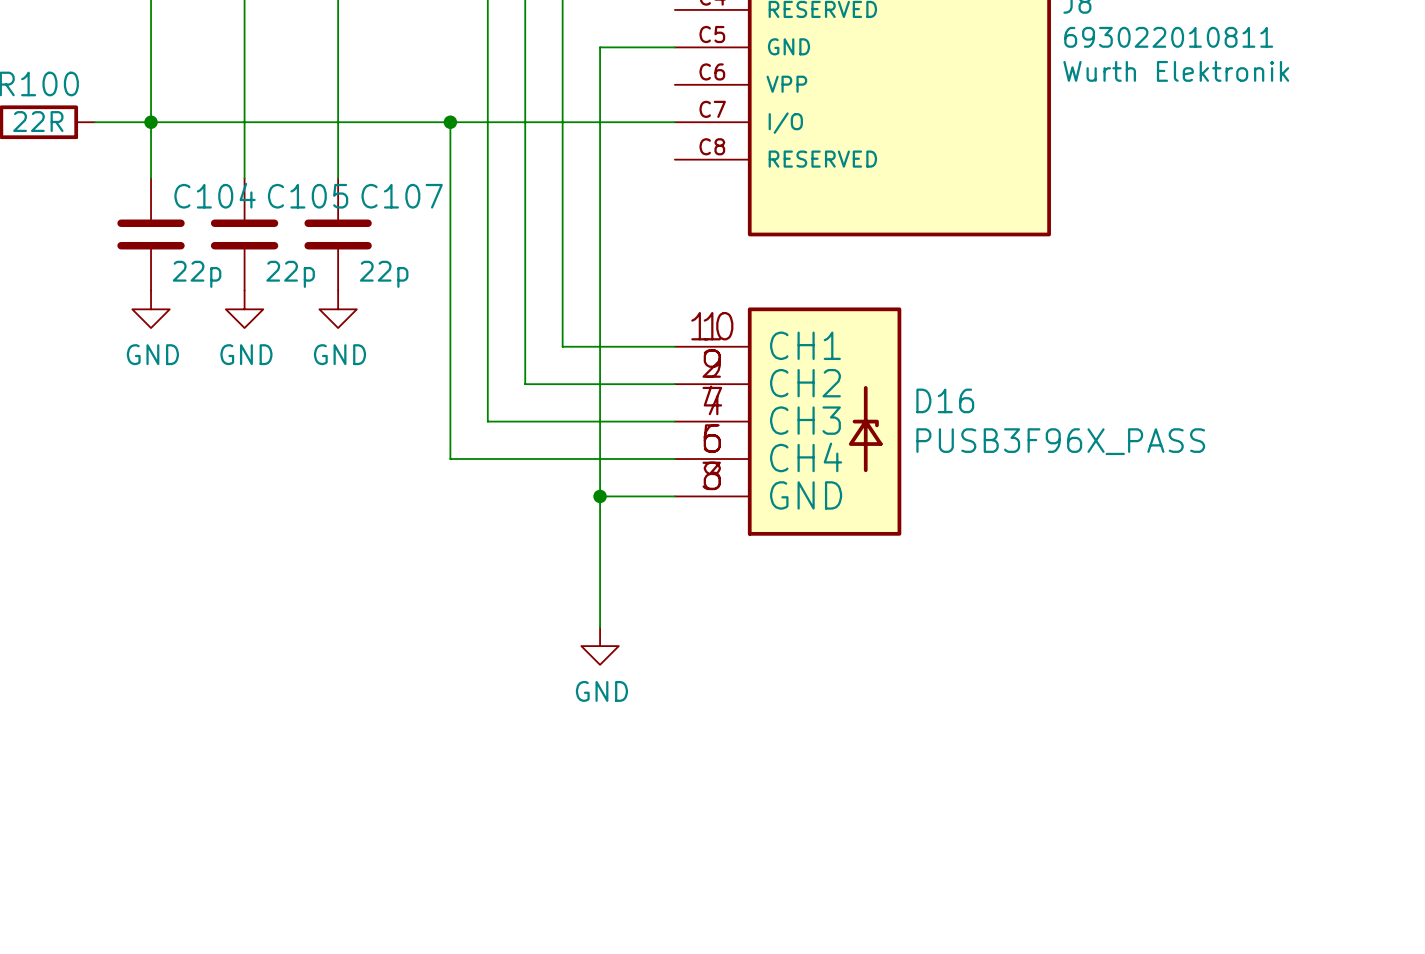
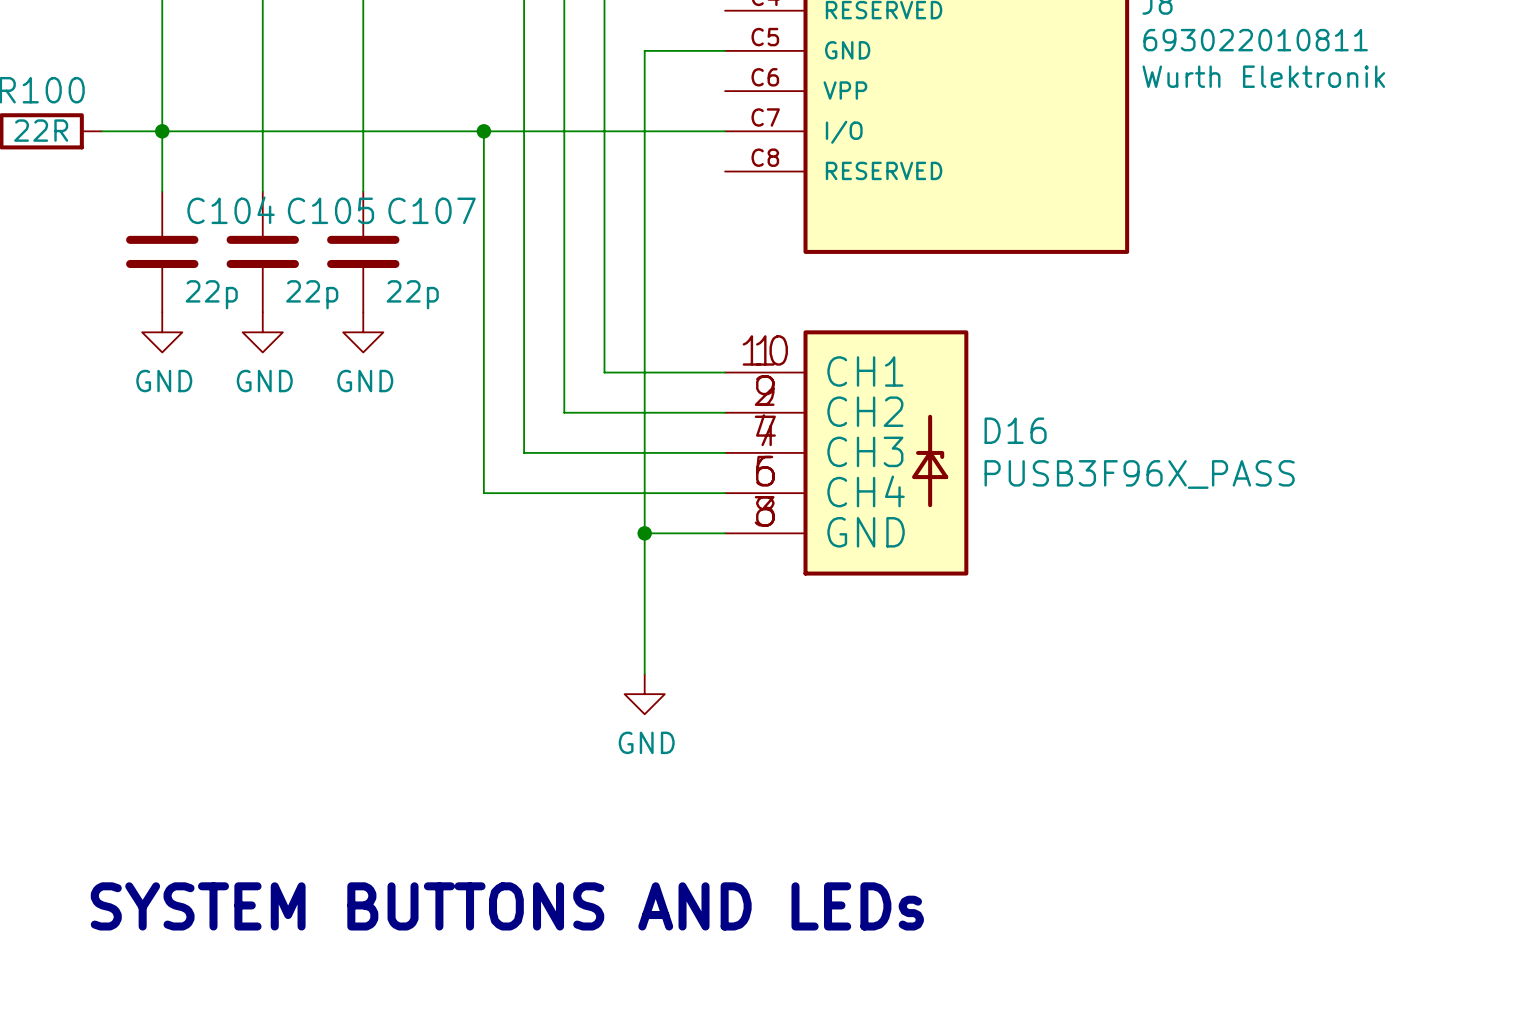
text: none -> SYSTEM BUTTONS AND LEDs (507, 906)

